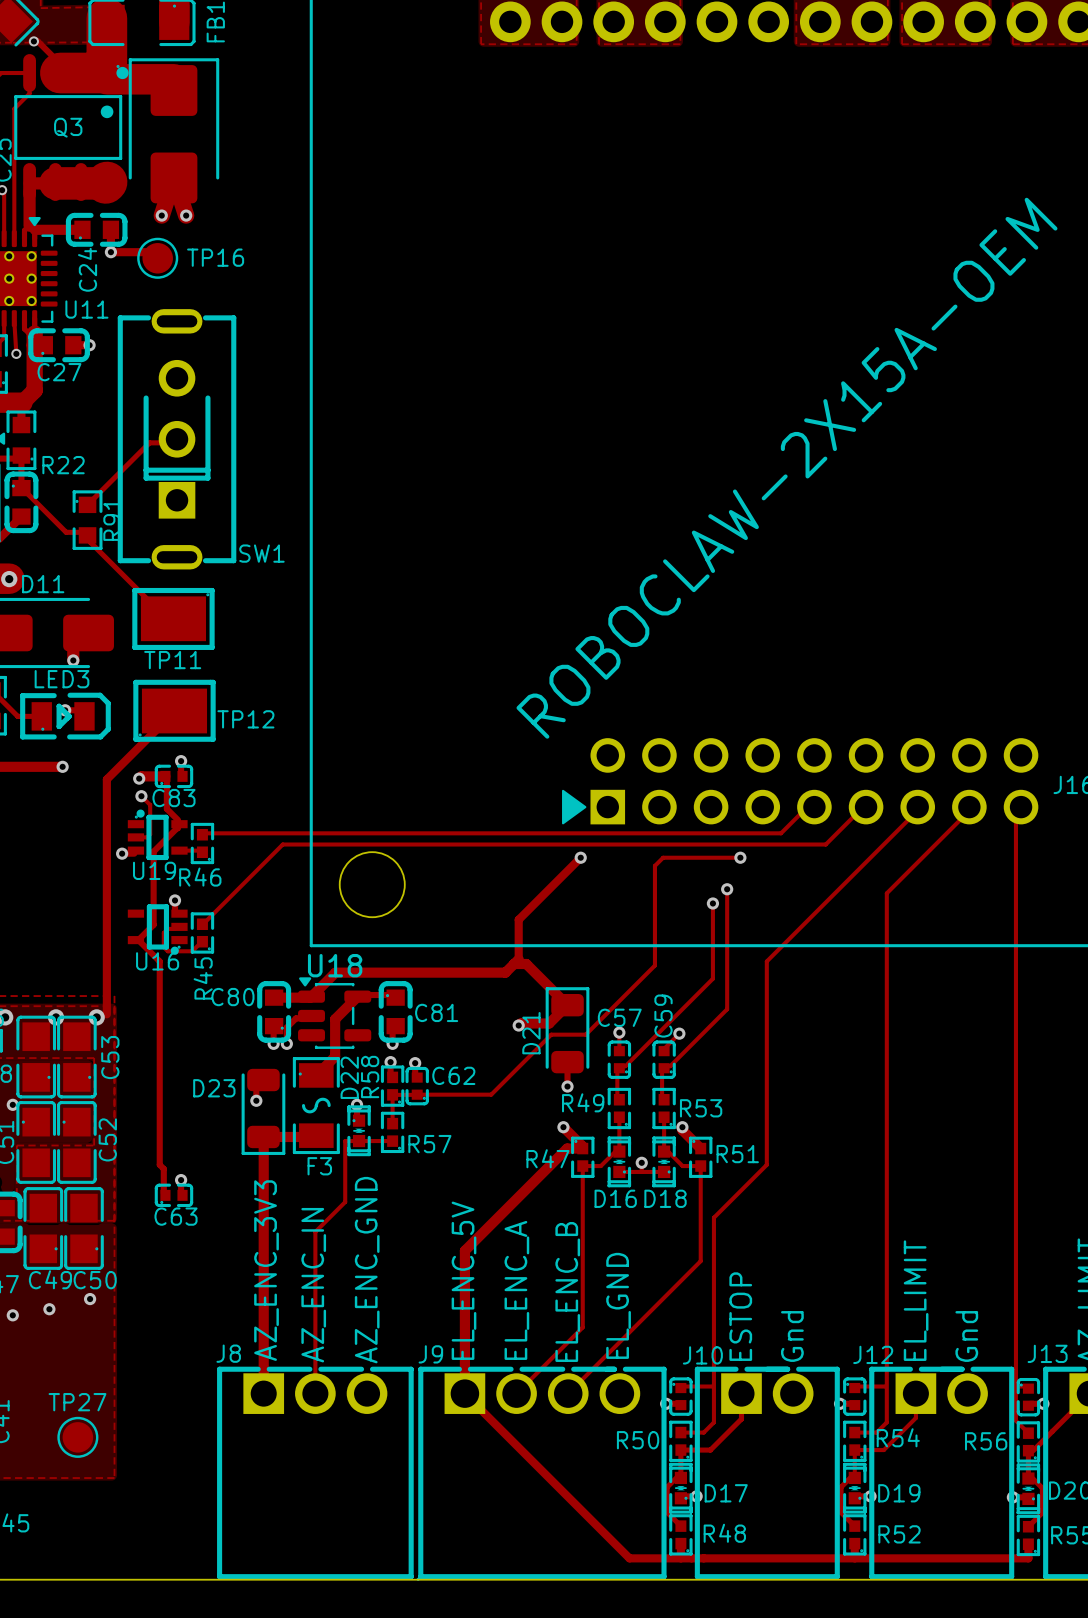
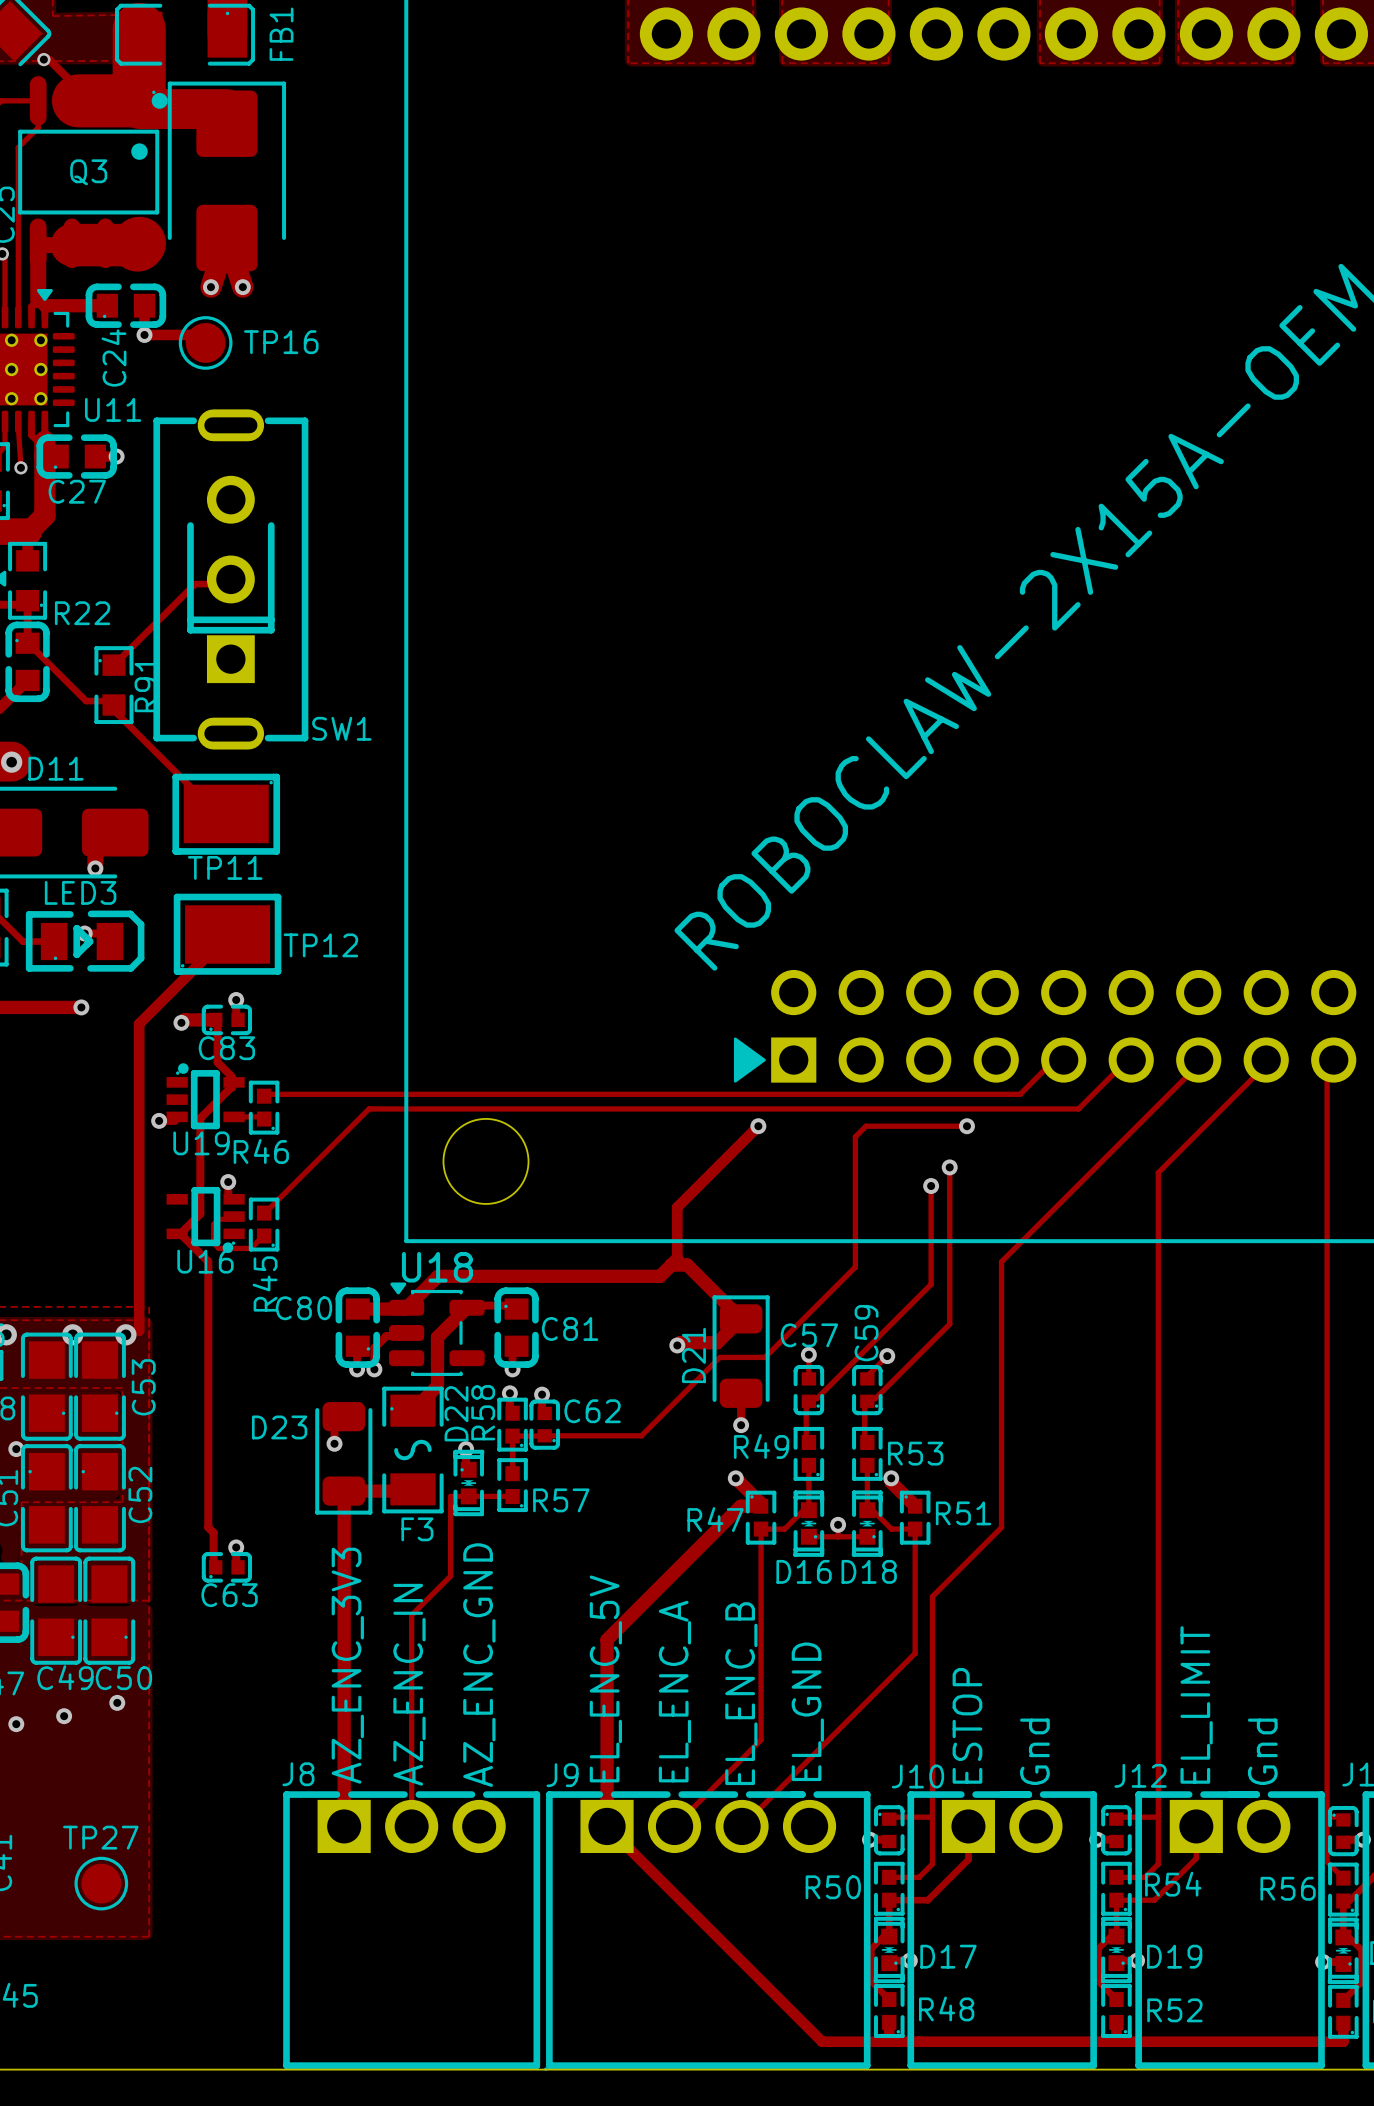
track: (141, 796) (150, 804) (150, 834) (147, 837) (135, 837) -> none
via: (141, 796) -> none

